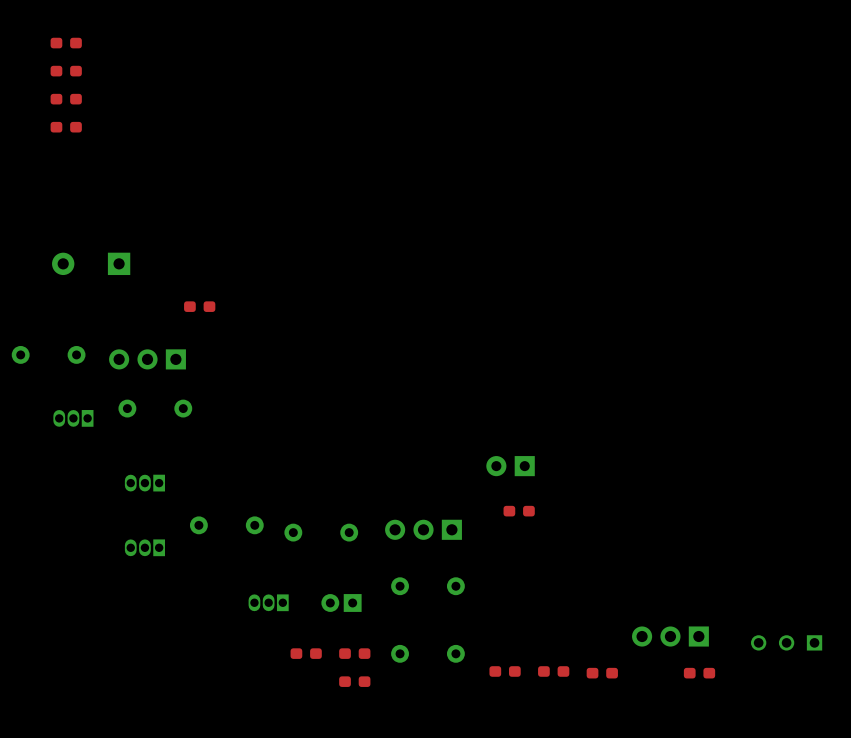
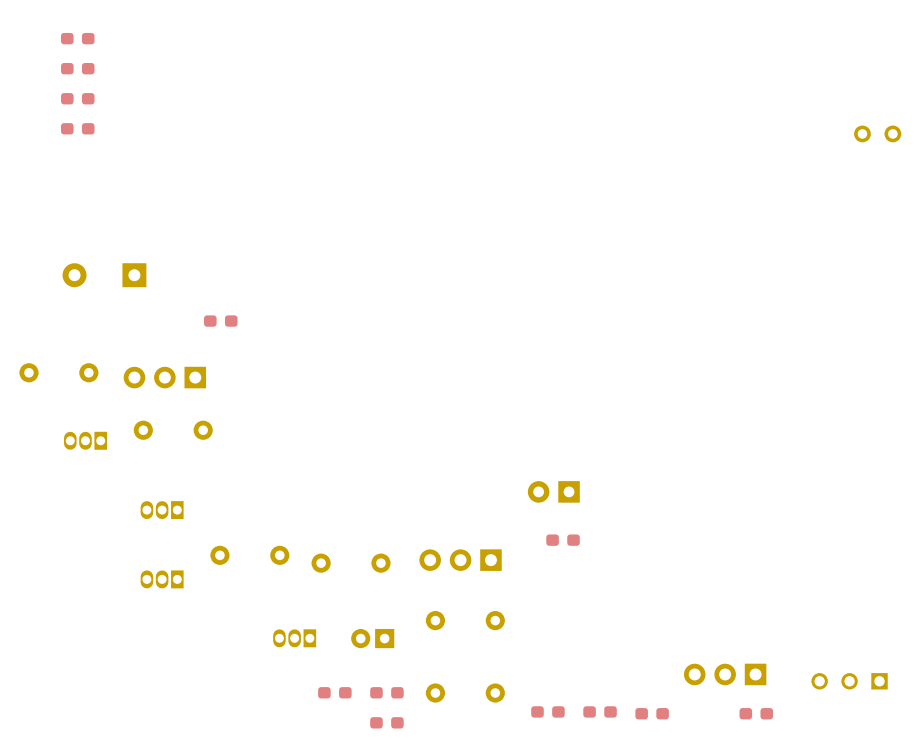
part: none -> (877, 133)

